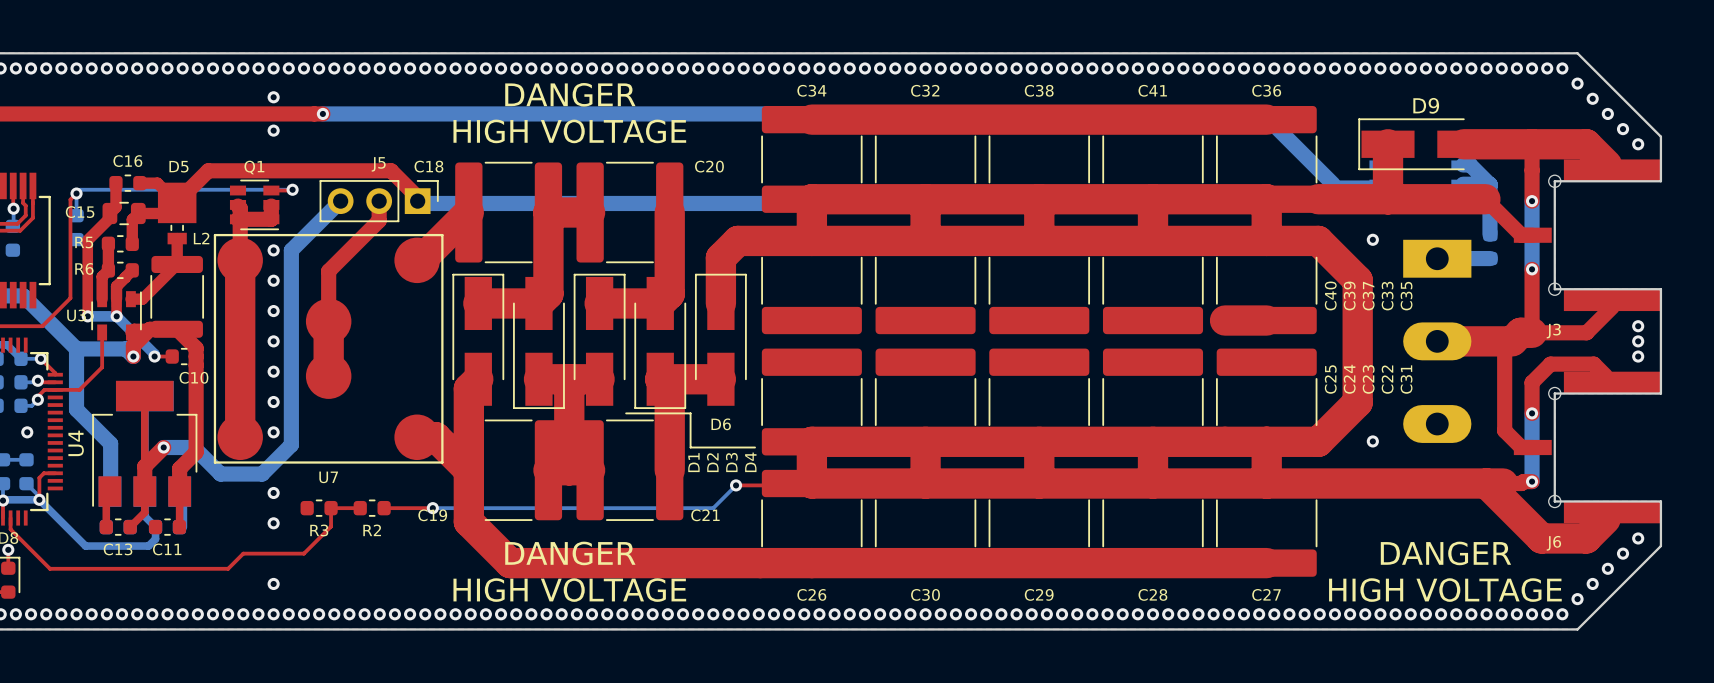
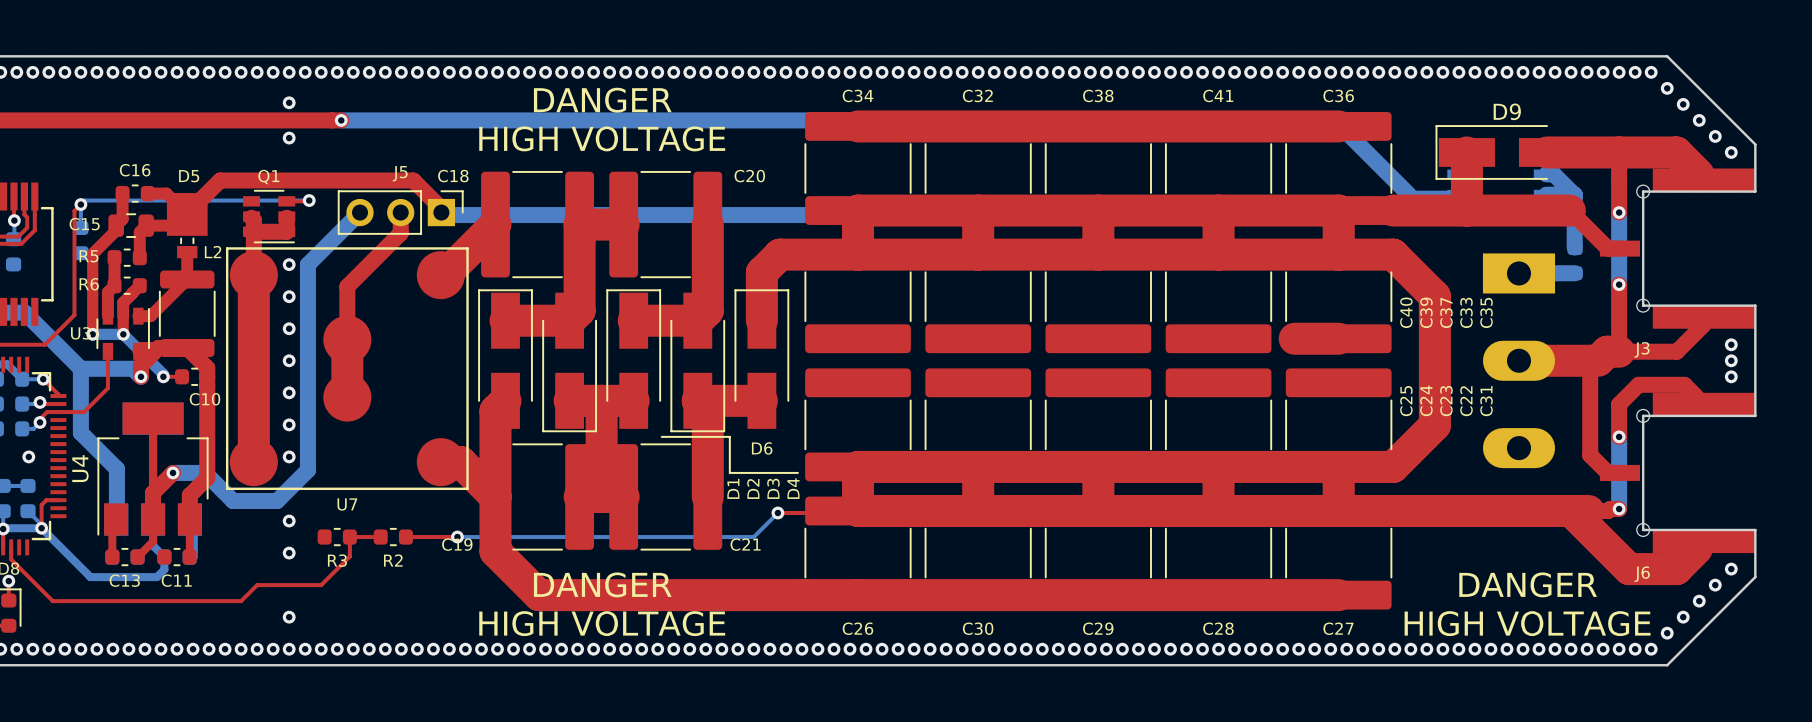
via: (1372, 239) -> none
via: (1372, 441) -> none

